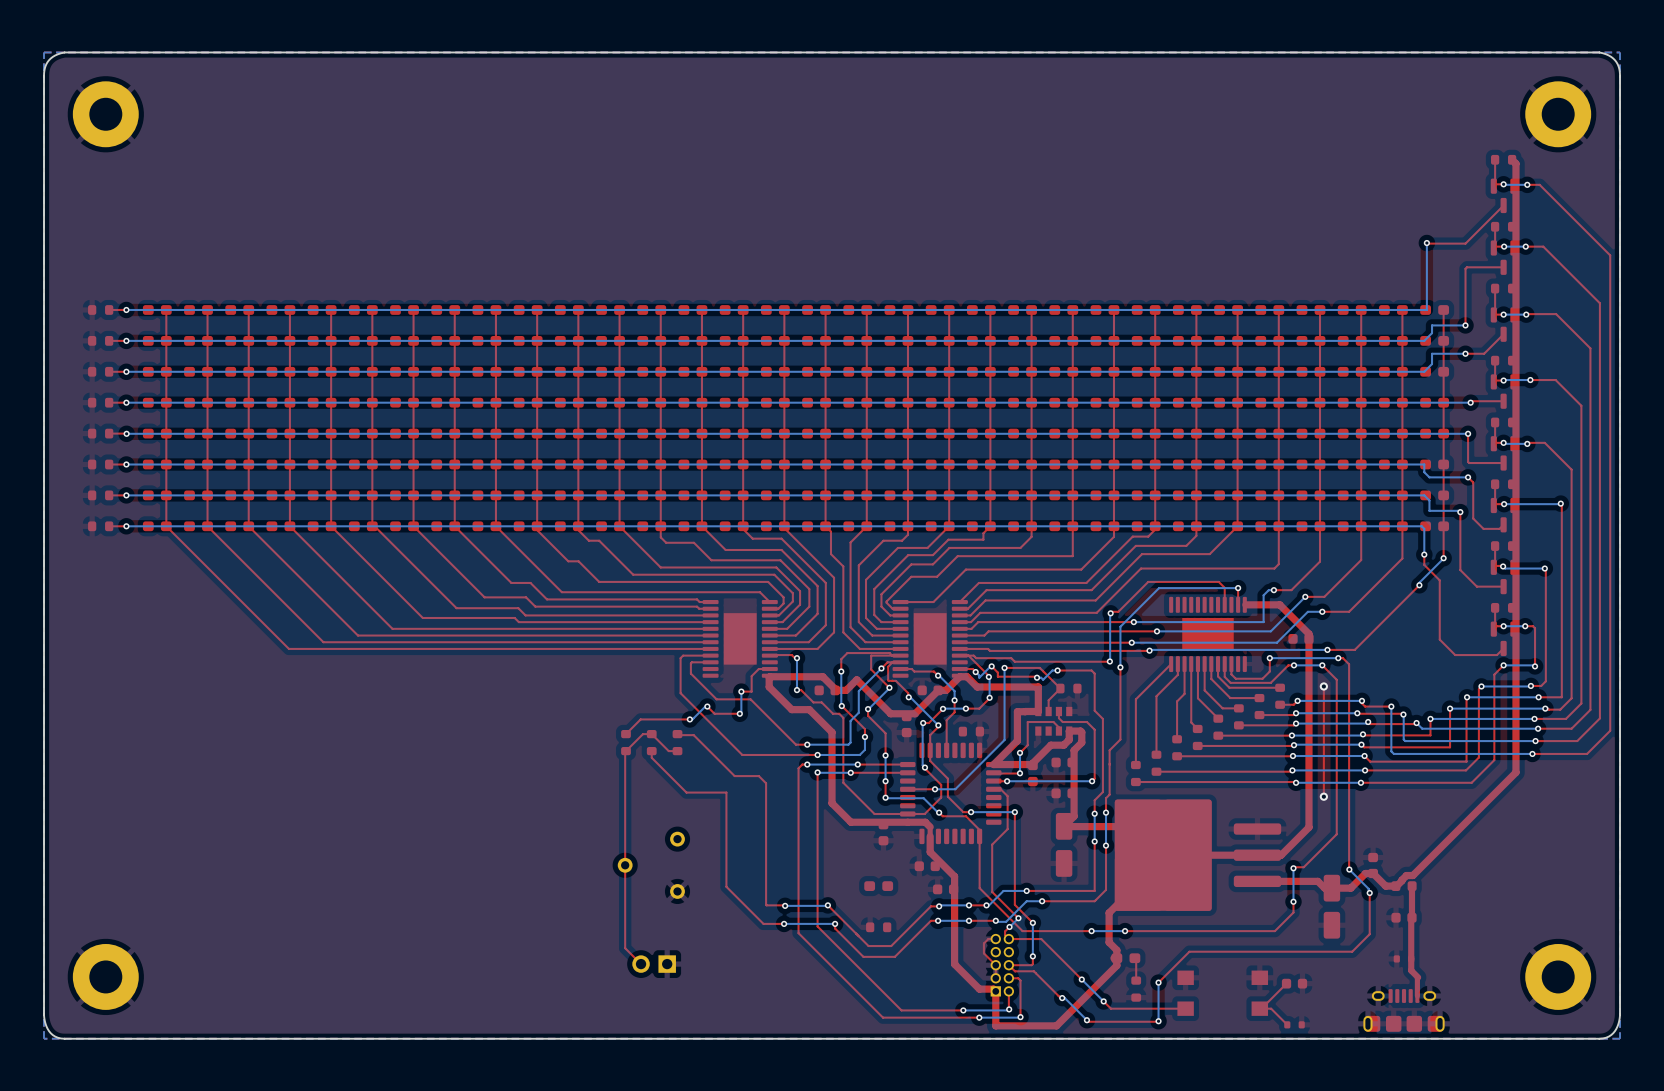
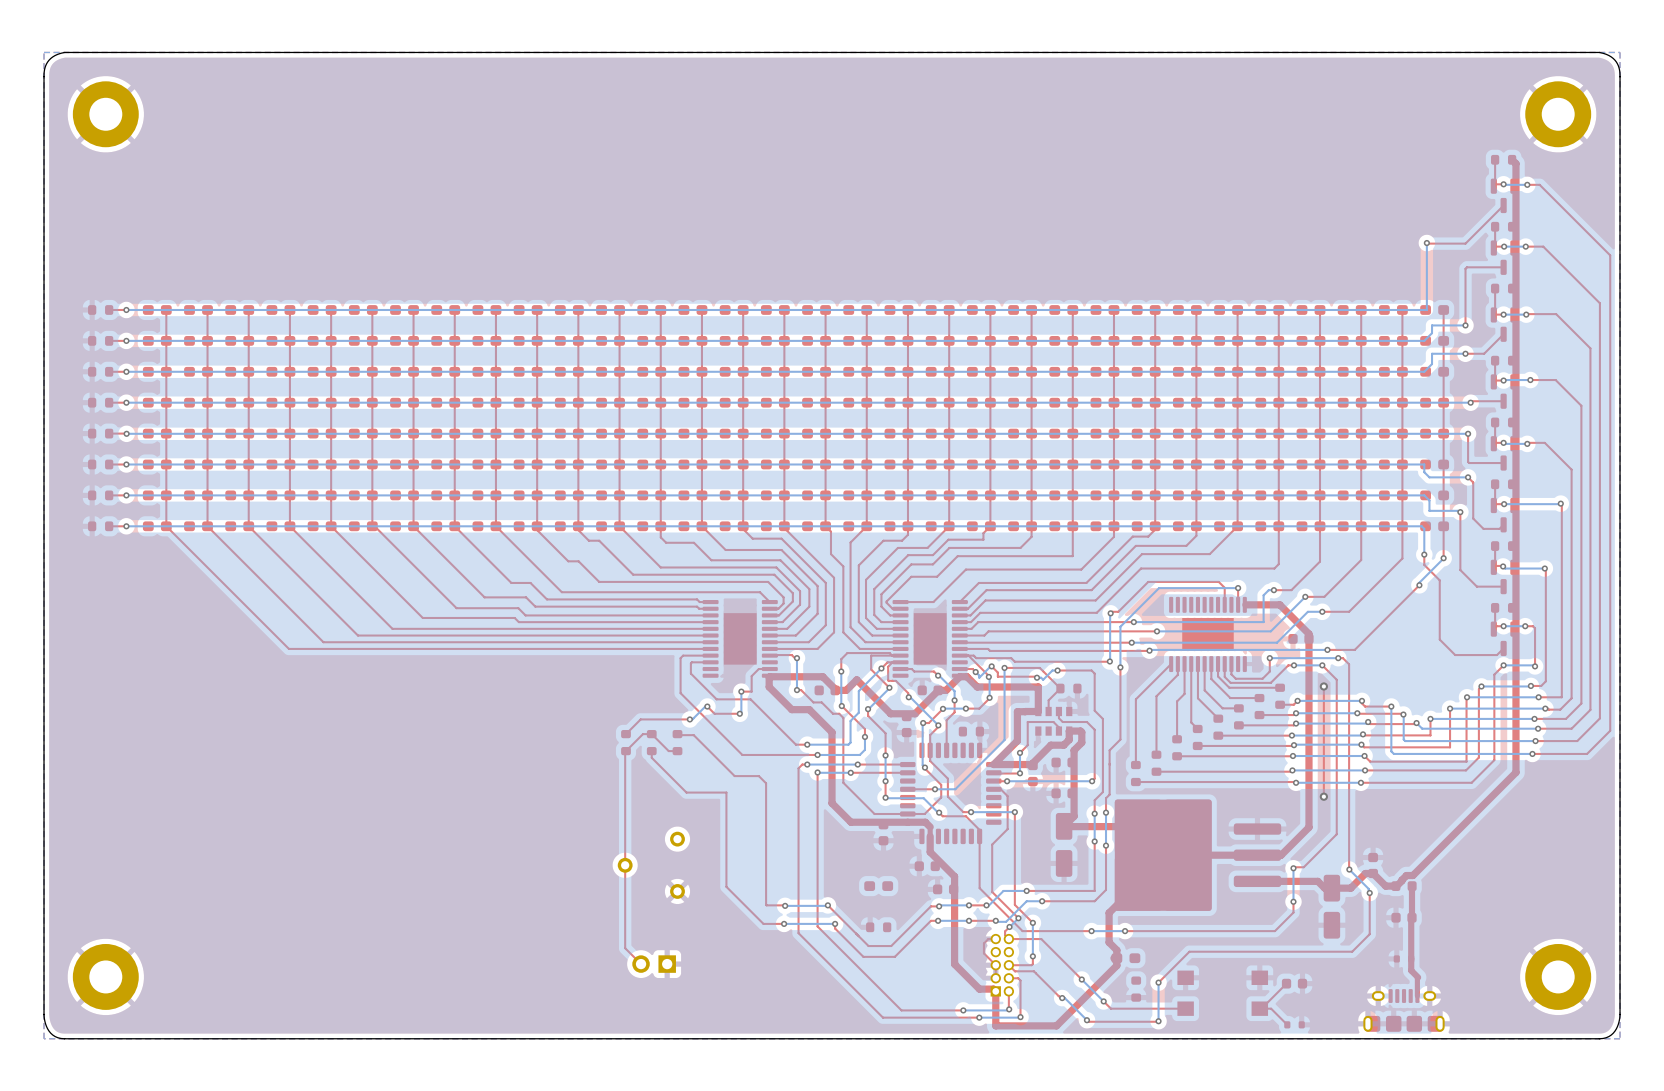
top track: (1134, 958) (1136, 980) -> none

